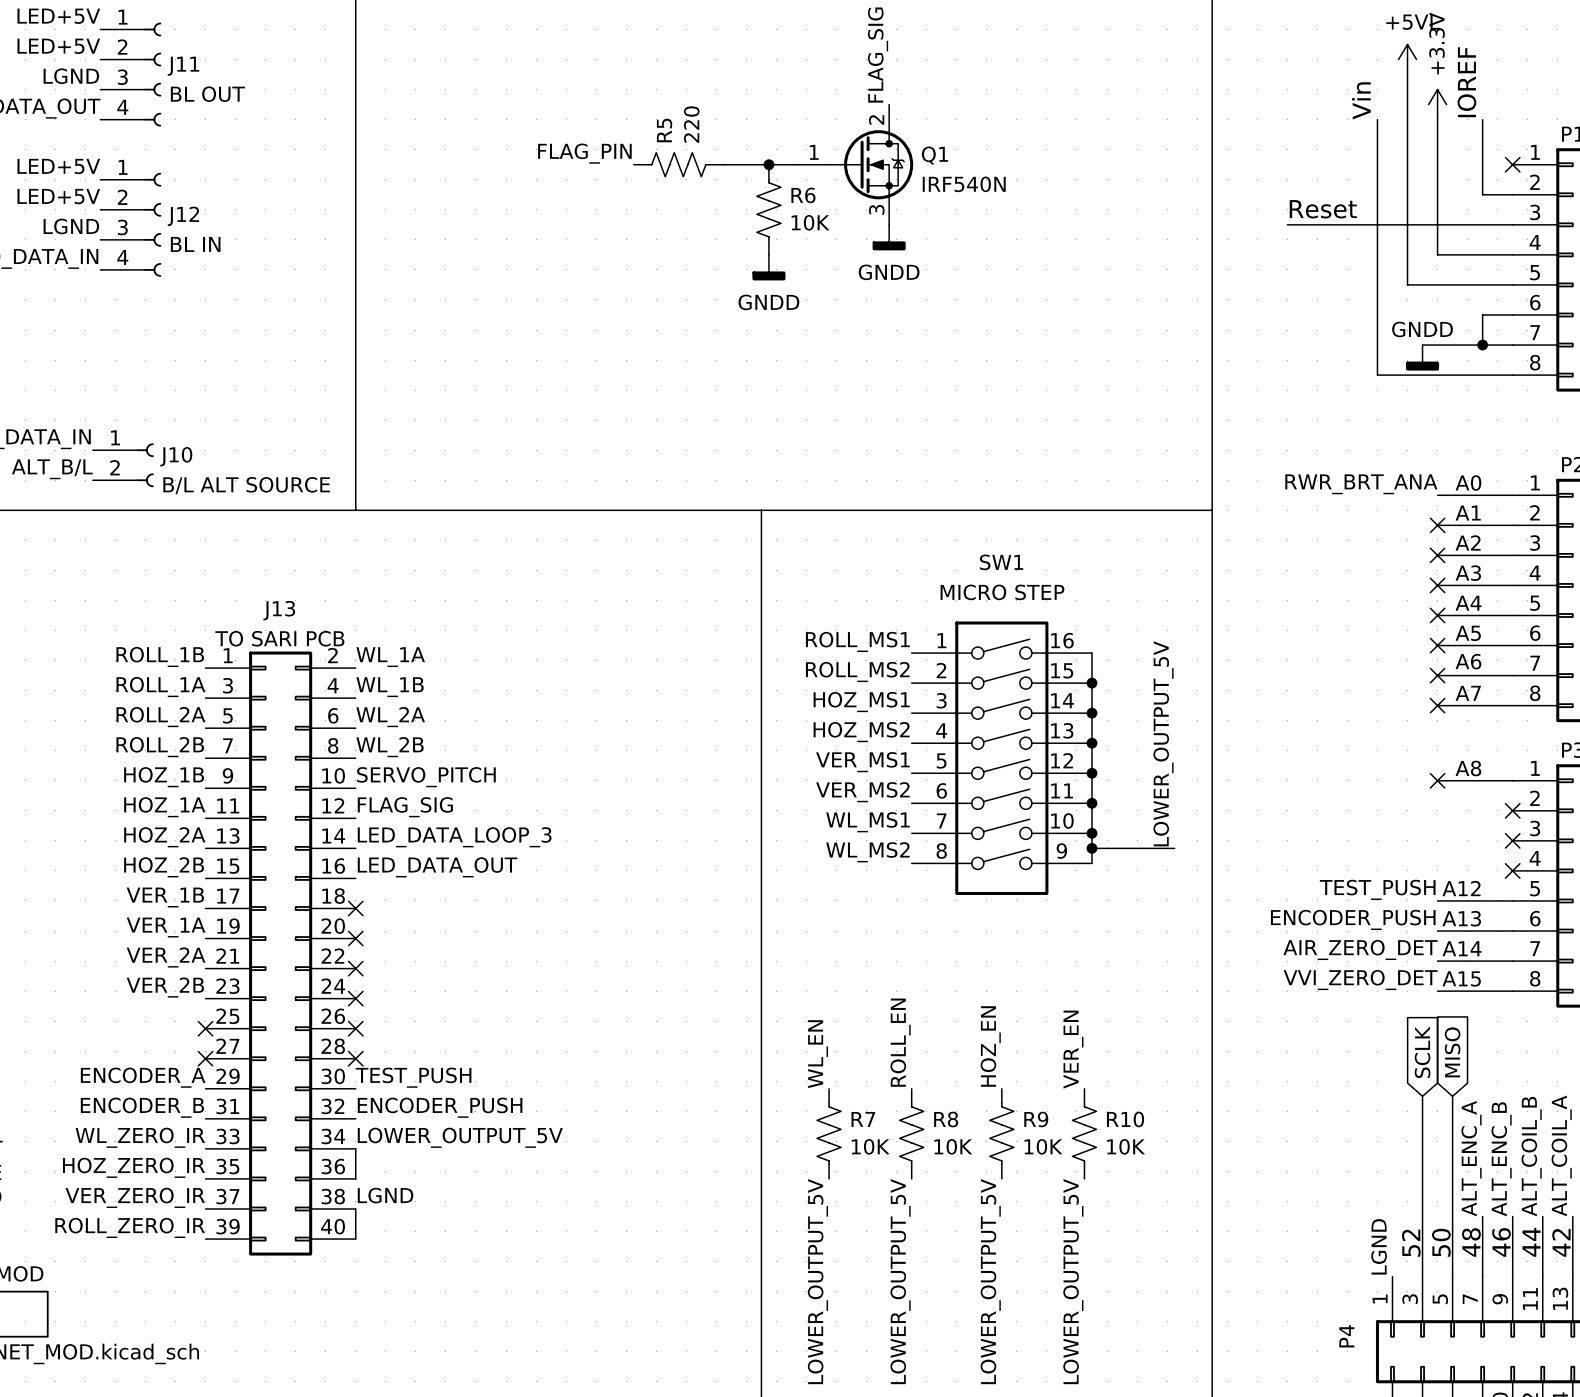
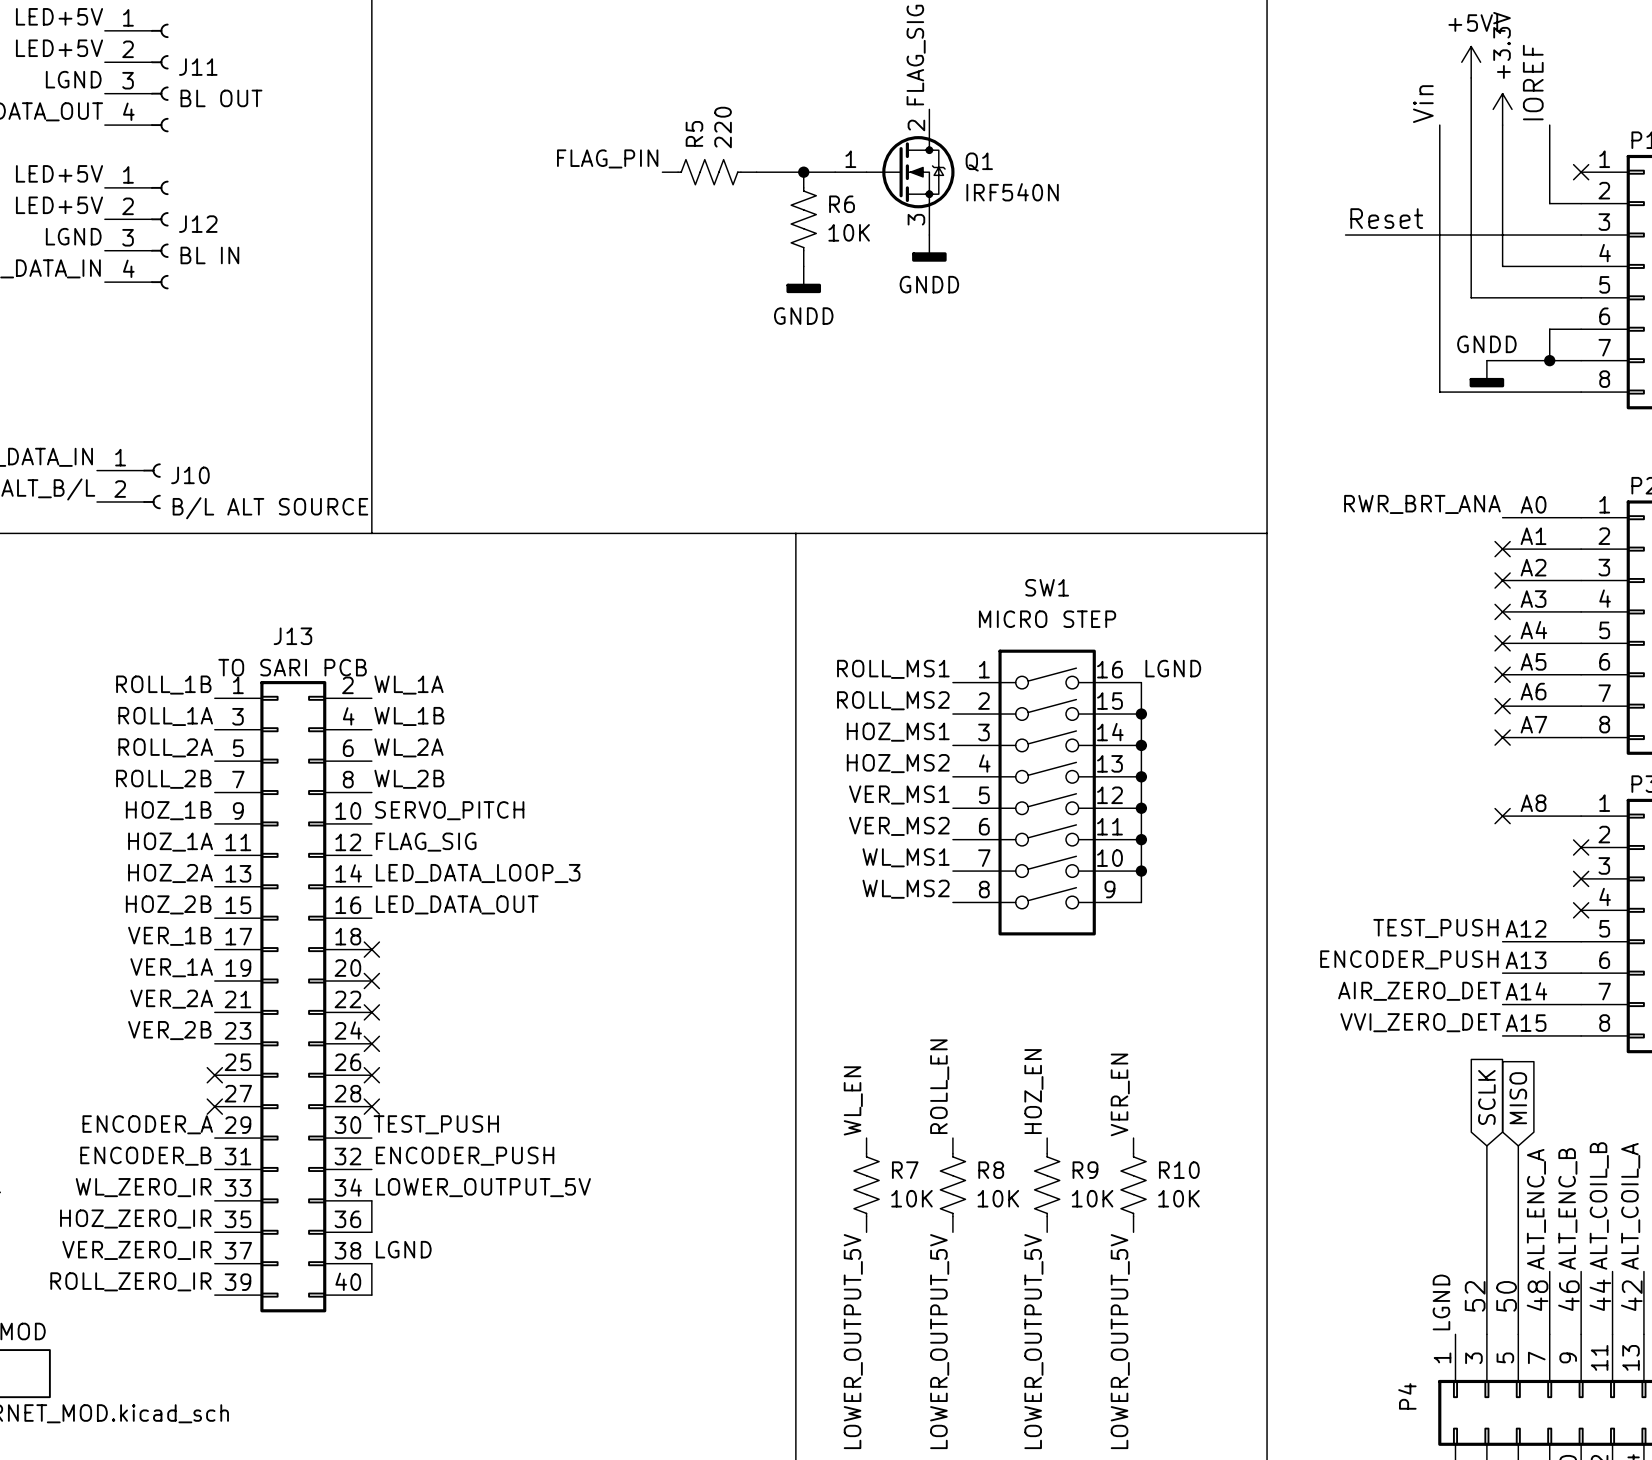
label: none -> LGND (1173, 668)
label: LOWER_OUTPUT_5V (1163, 743) -> none
wire: (1091, 848) (1174, 848) -> none
junction: (1091, 848) -> none

